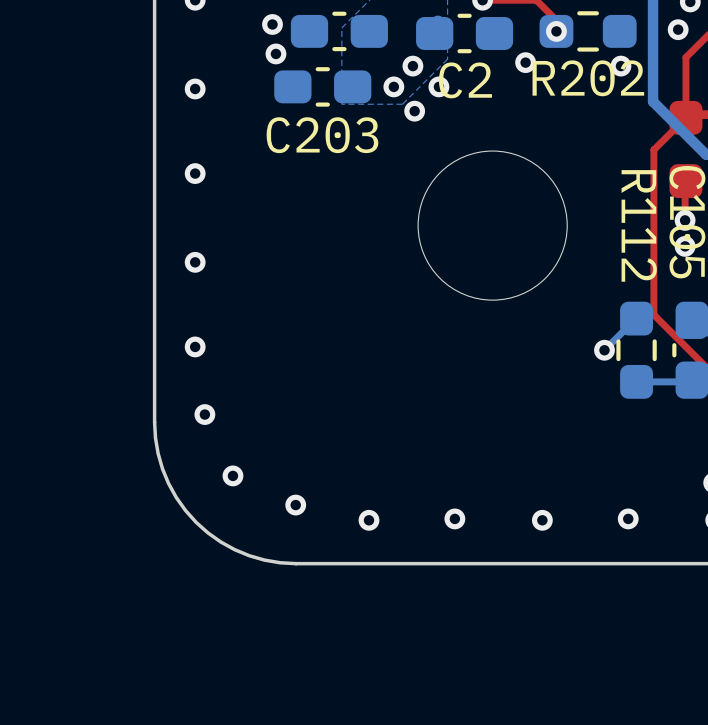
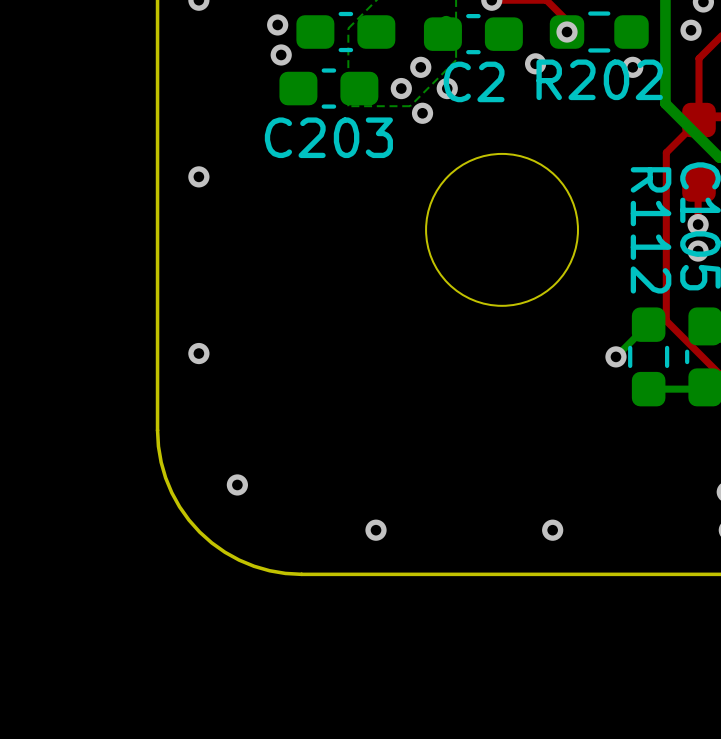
via: (195, 88) -> none
via: (195, 262) -> none
via: (204, 414) -> none
via: (295, 505) -> none
via: (454, 518) -> none
via: (628, 518) -> none

